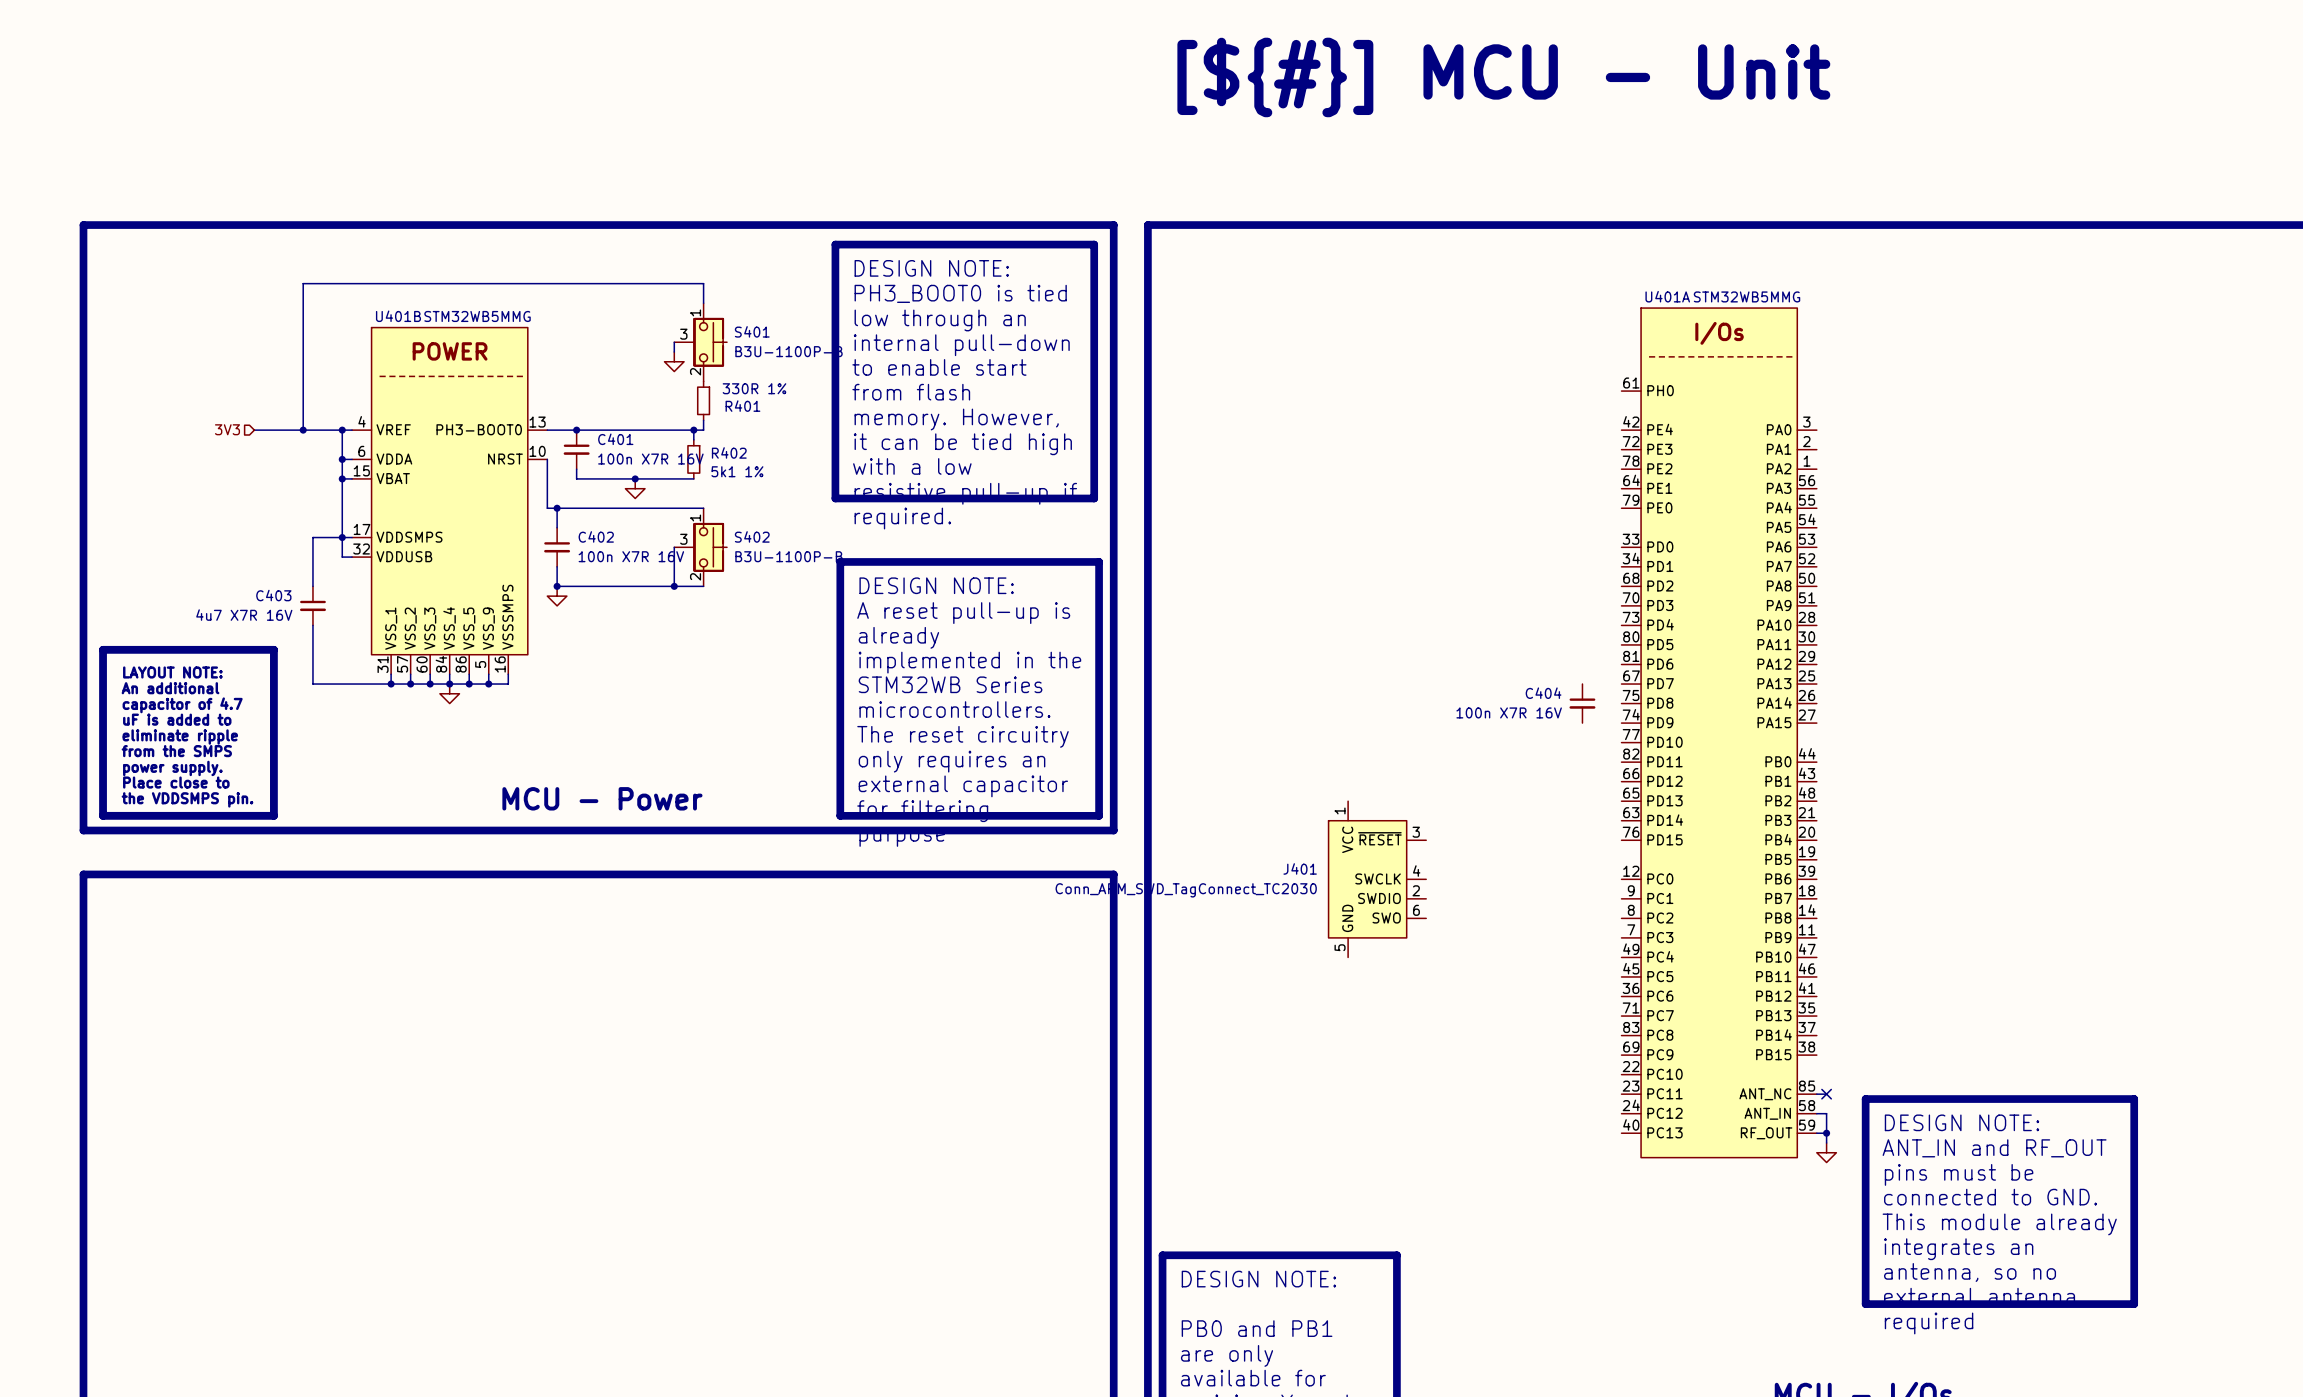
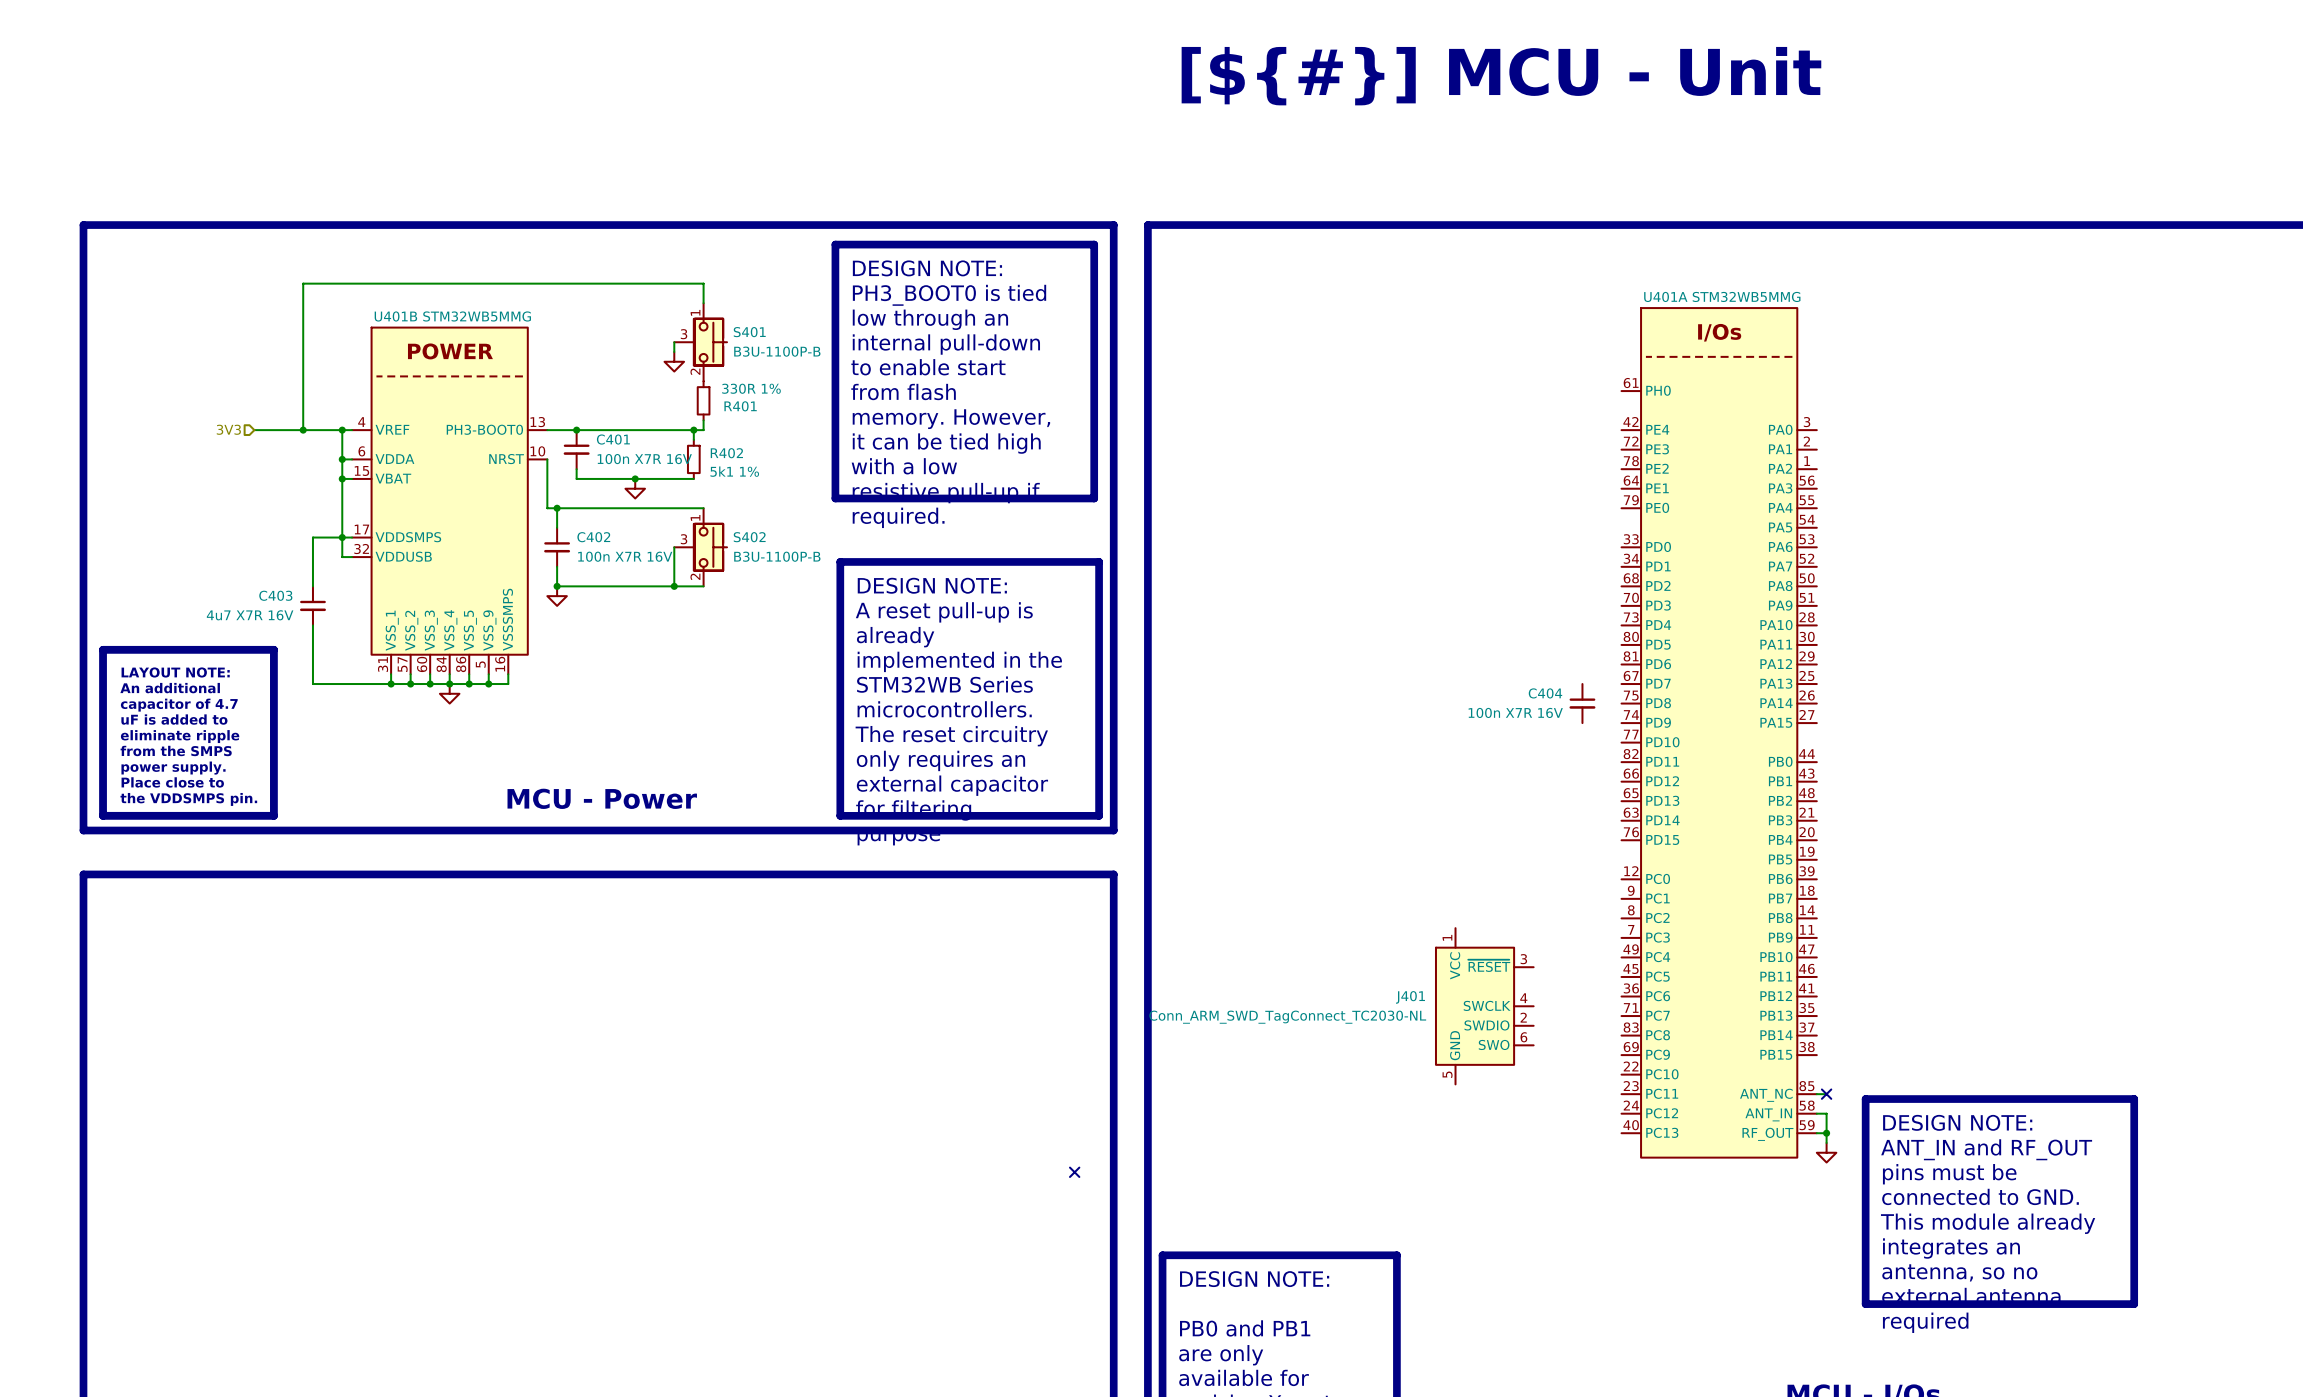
J401 position: (1377, 879) -> (1484, 1006)
J401 value: Conn_ARM_SWD_TagConnect_TC2030 (1186, 890) -> Conn_ARM_SWD_TagConnect_TC2030-NL (1287, 1017)
no-connect mark: none -> (1074, 1172)

